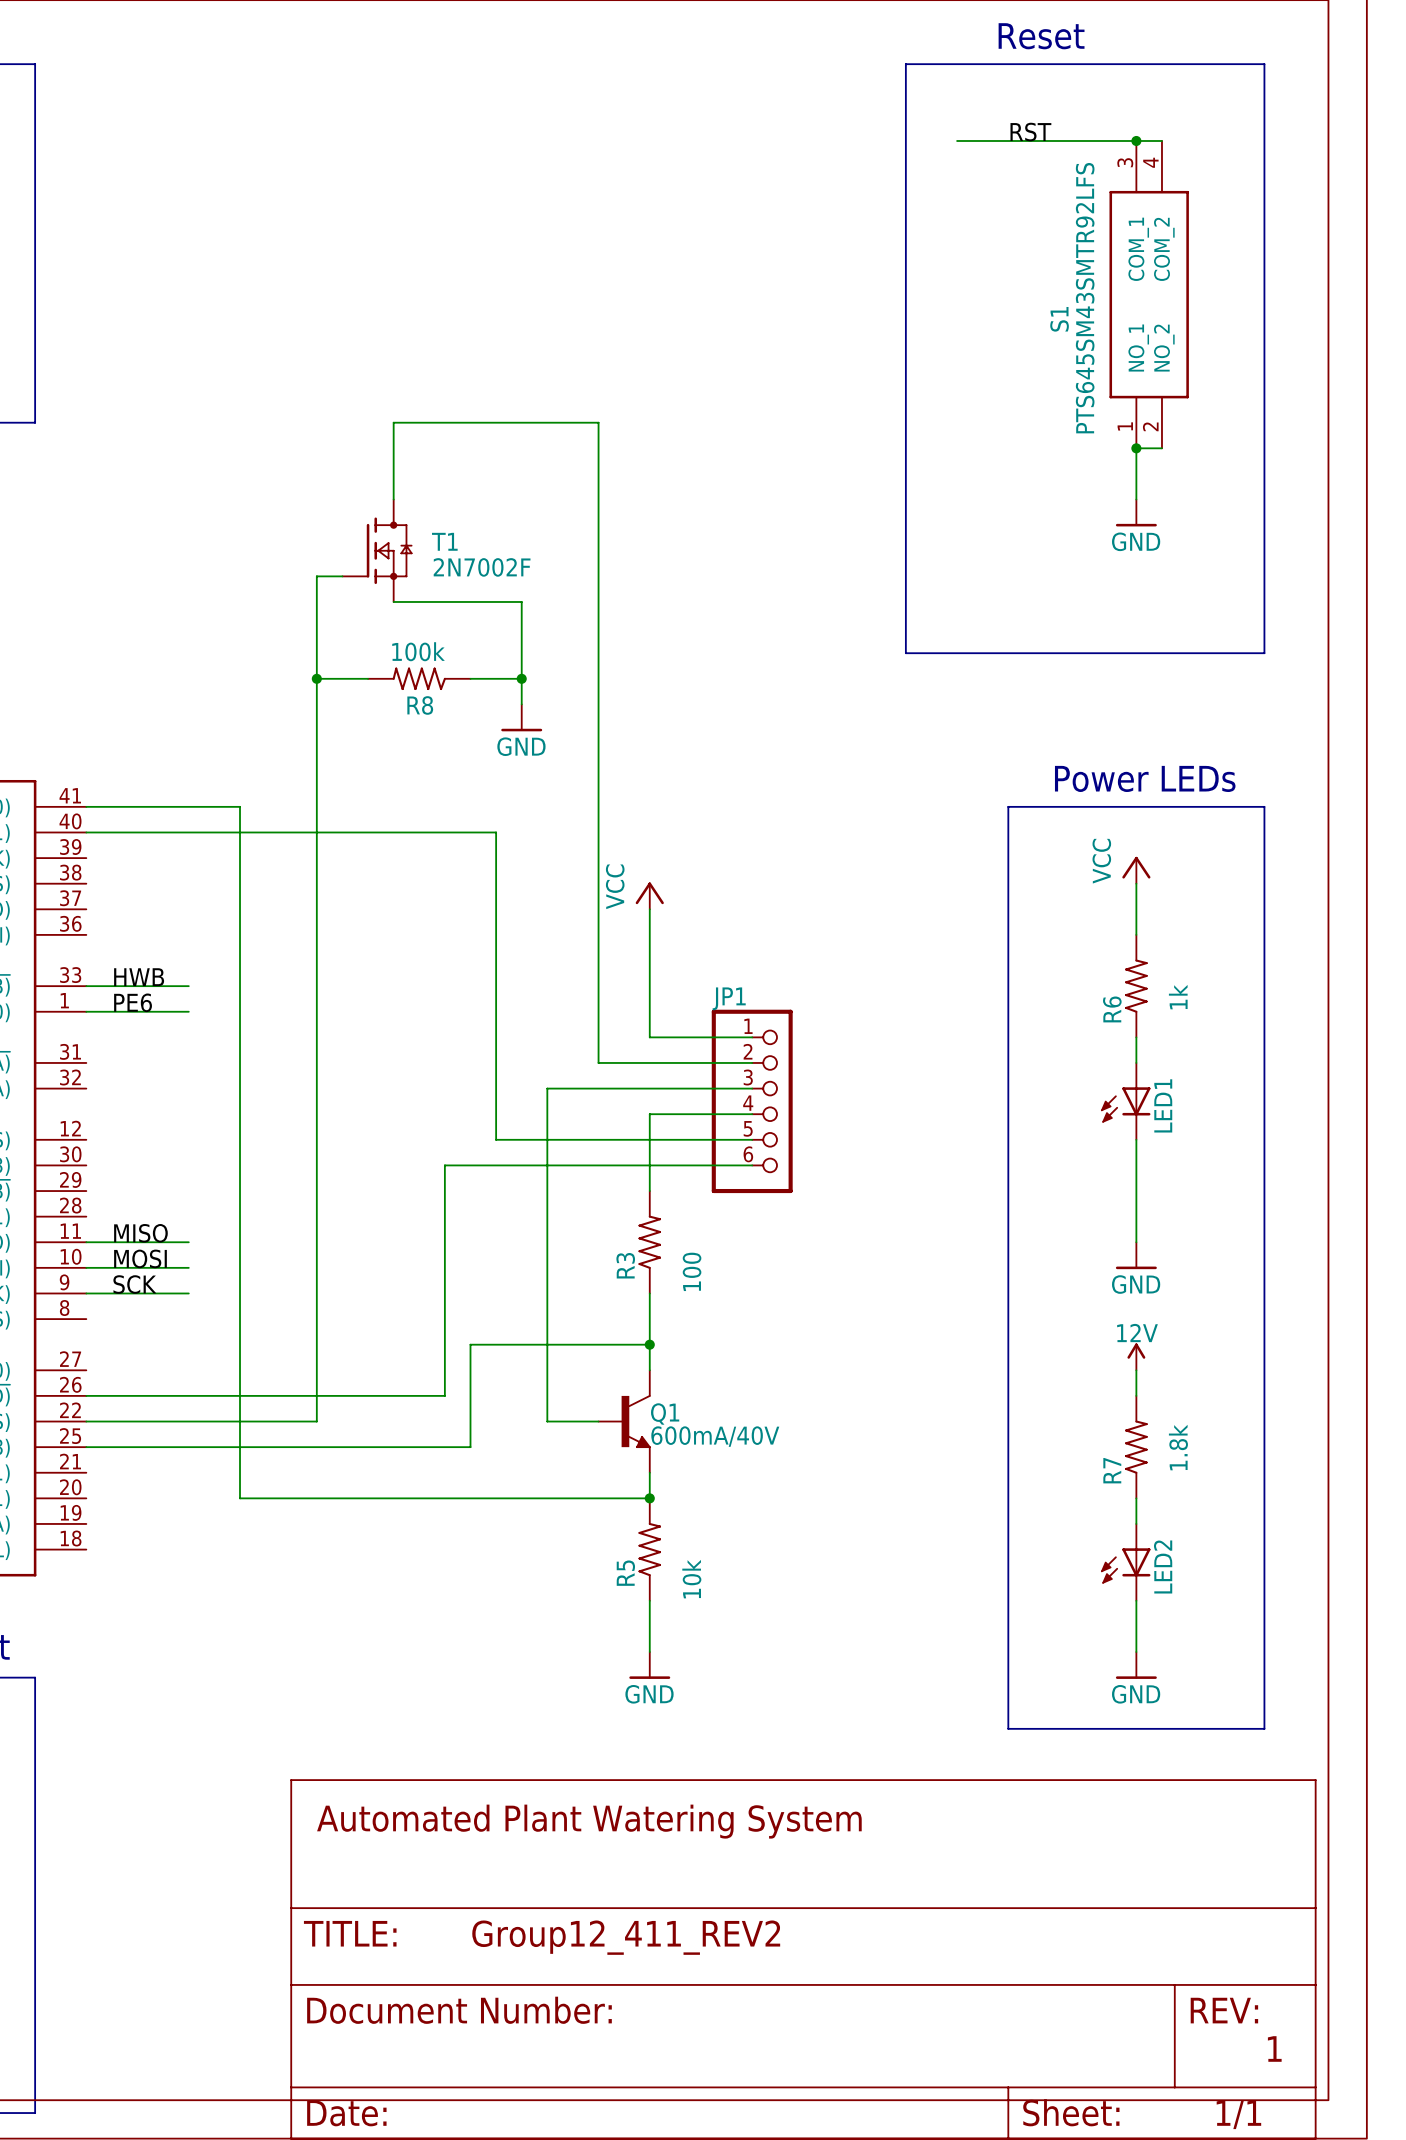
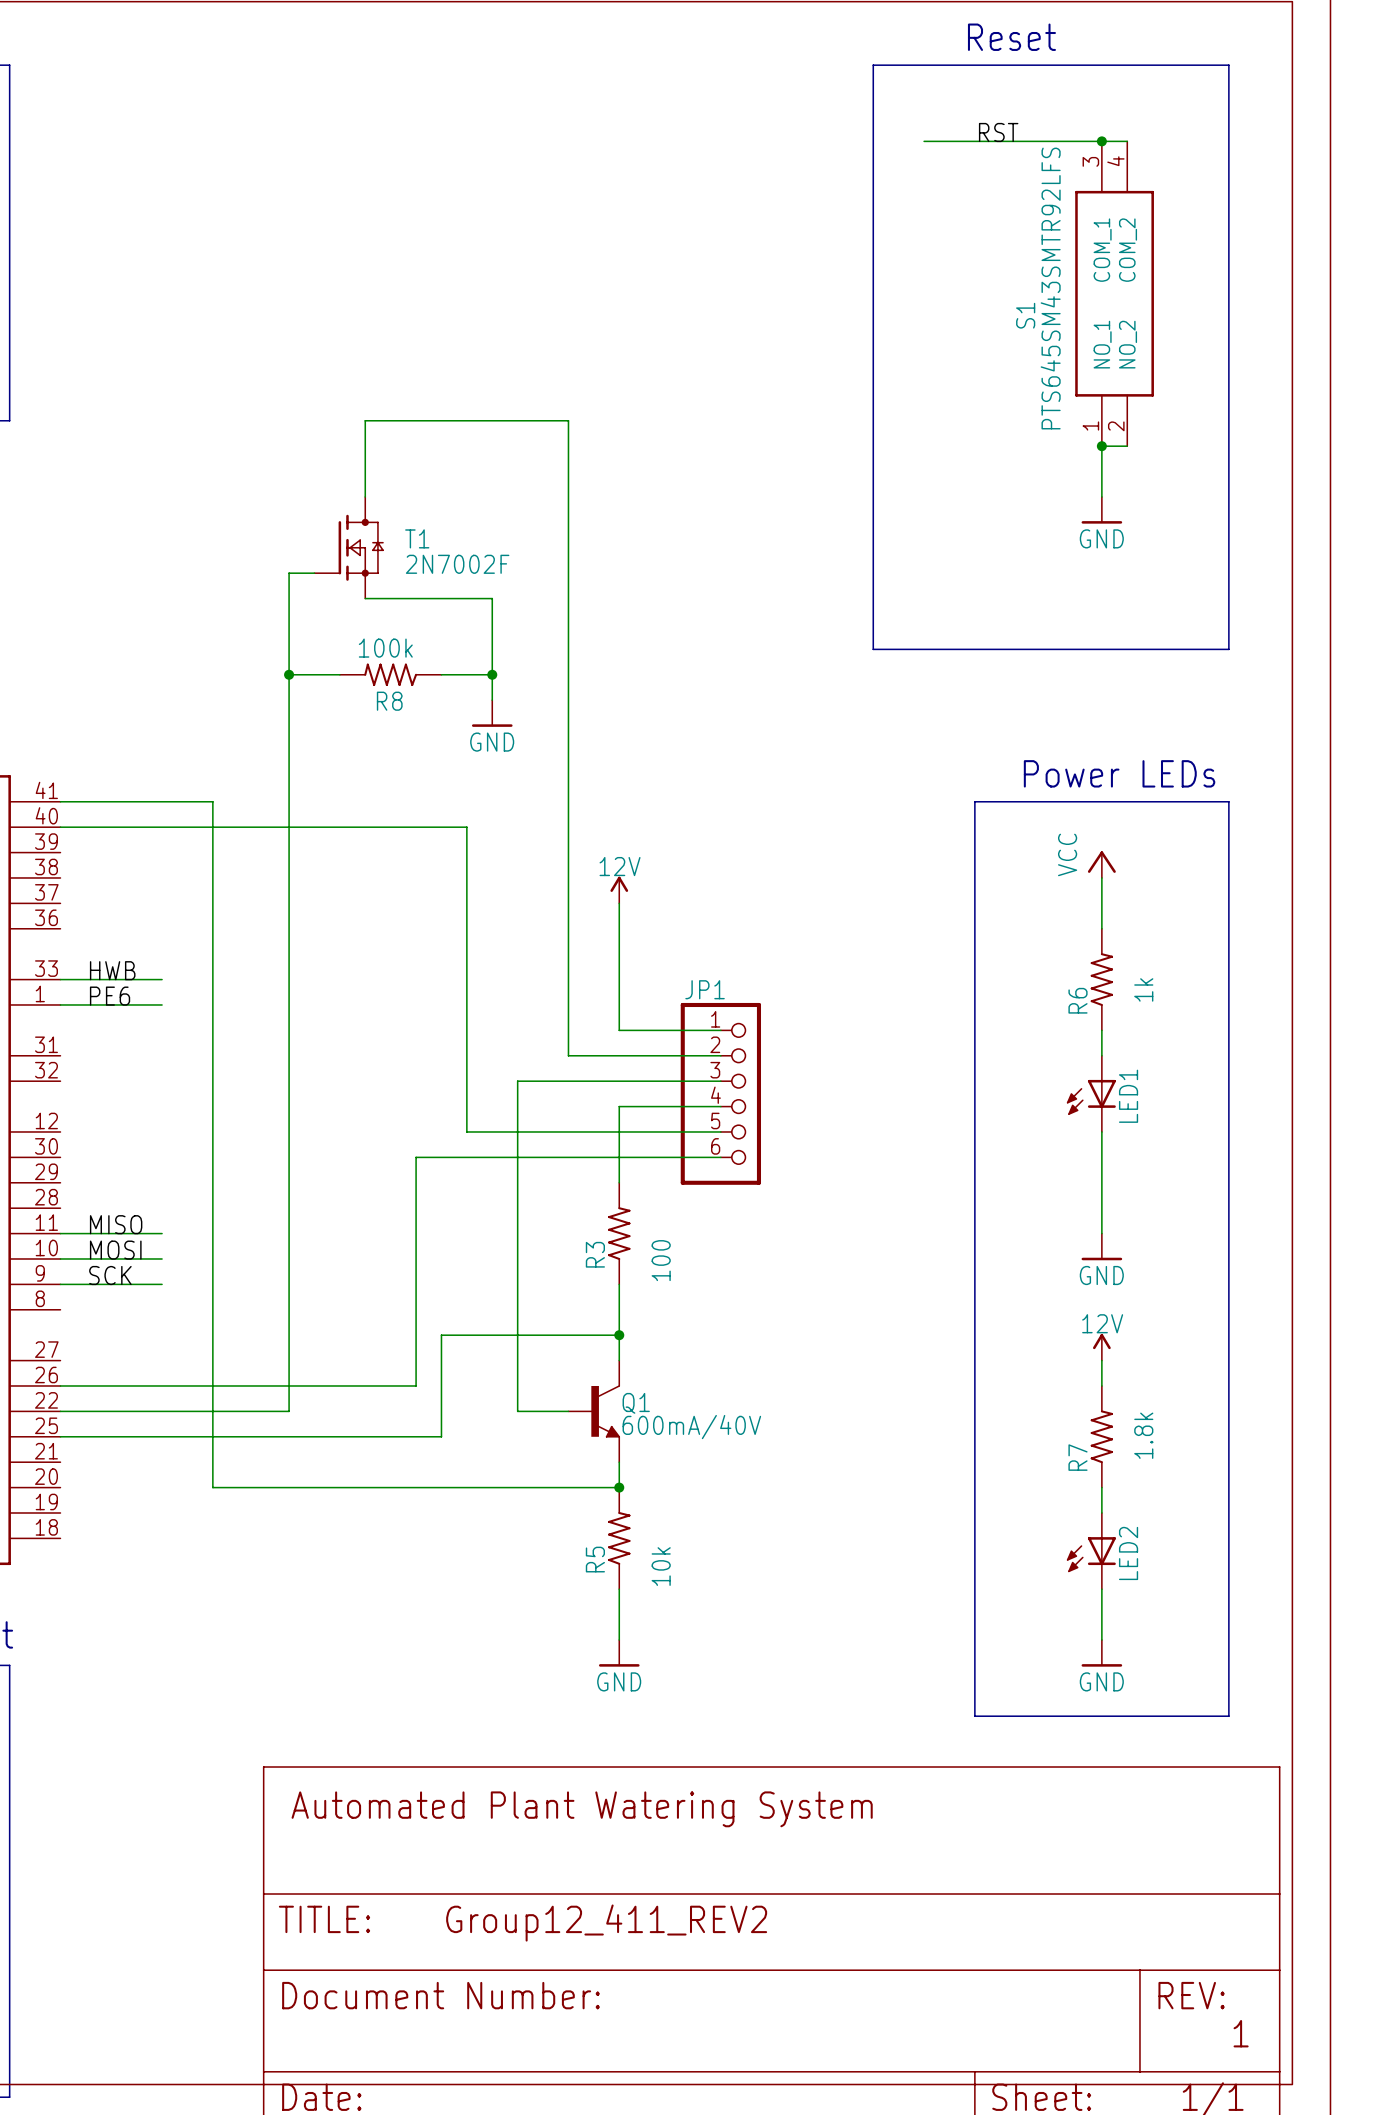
power symbol: VCC (649, 895) -> 12V (619, 890)

